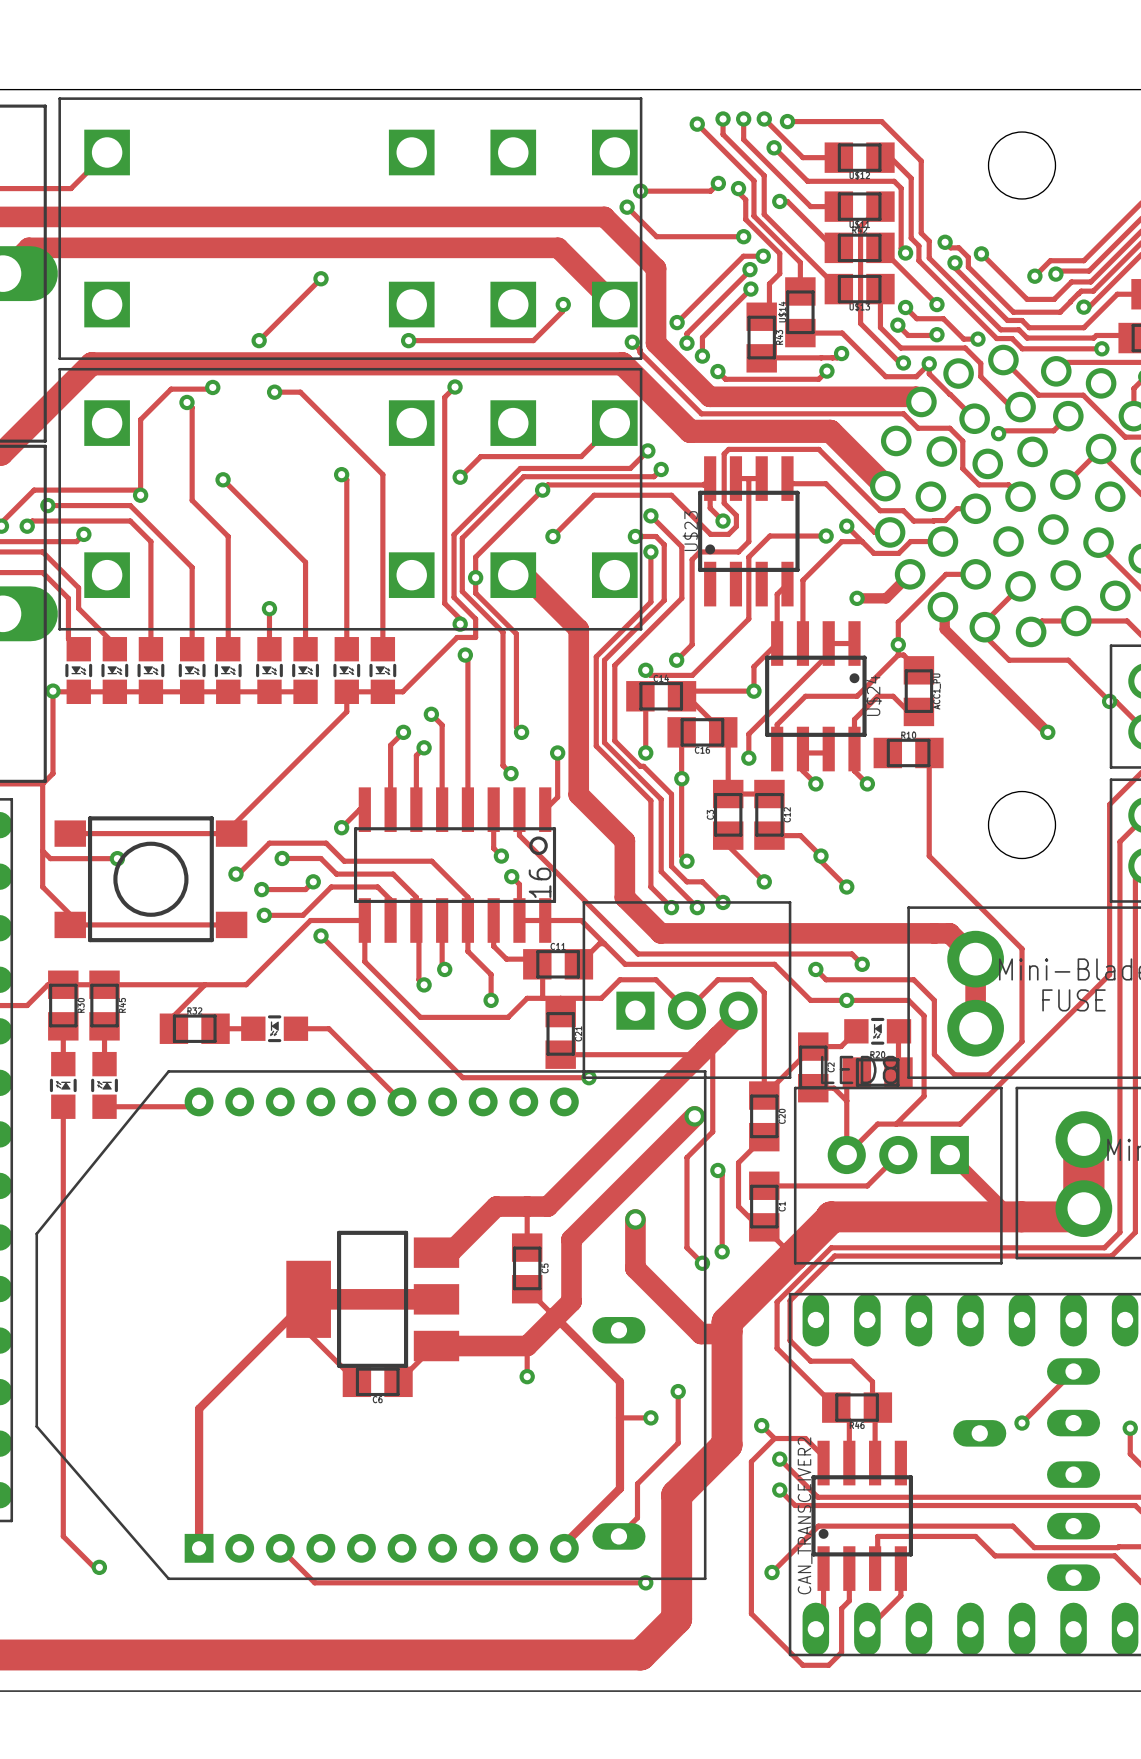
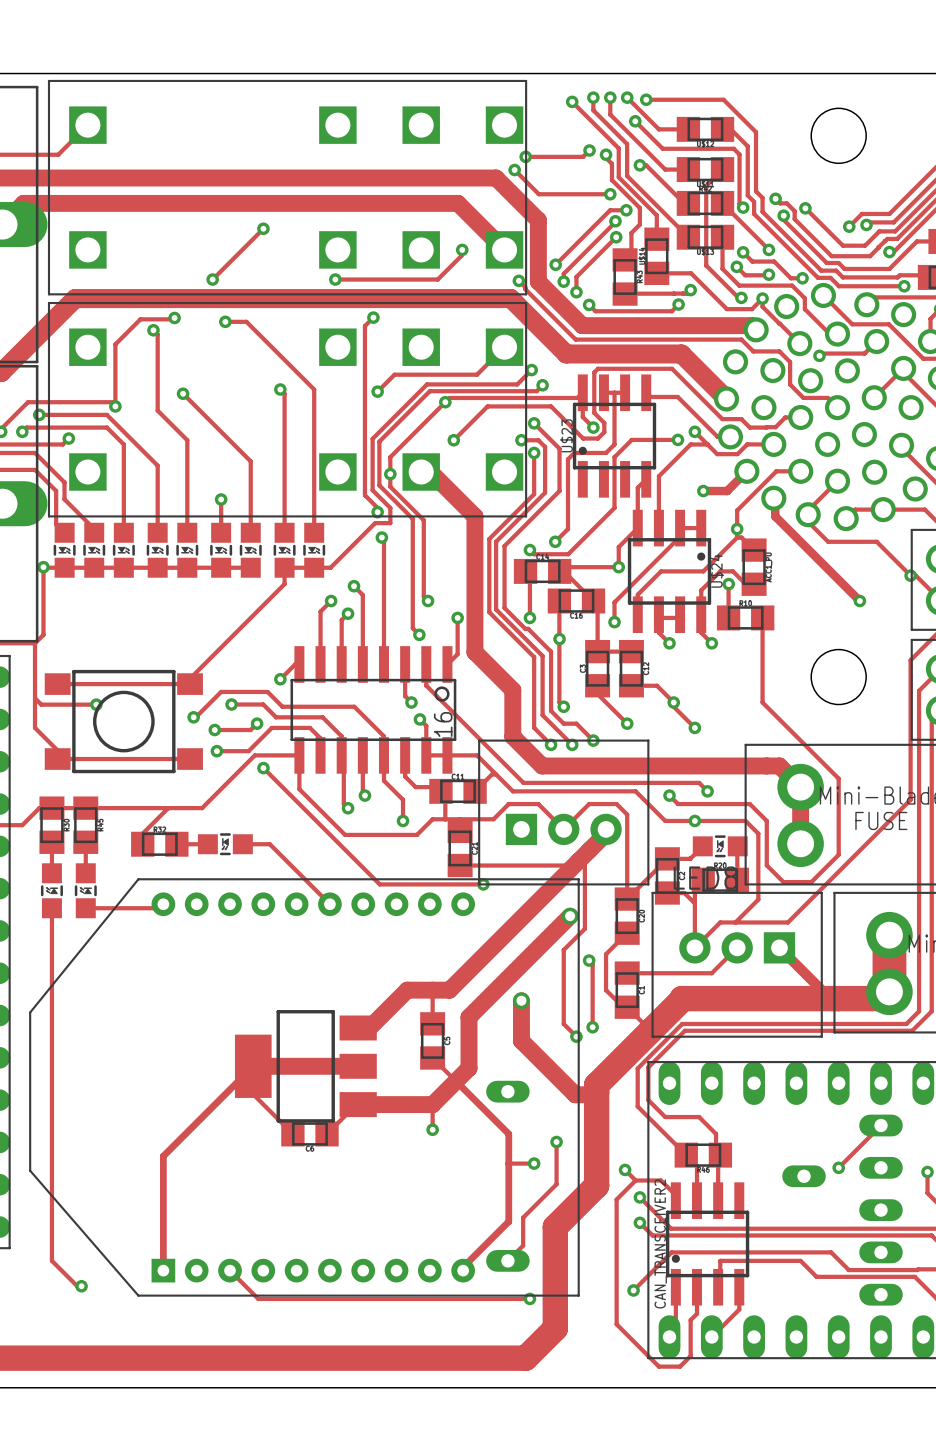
track: none -> (728, 584) (728, 617)
via: none -> (728, 584)

